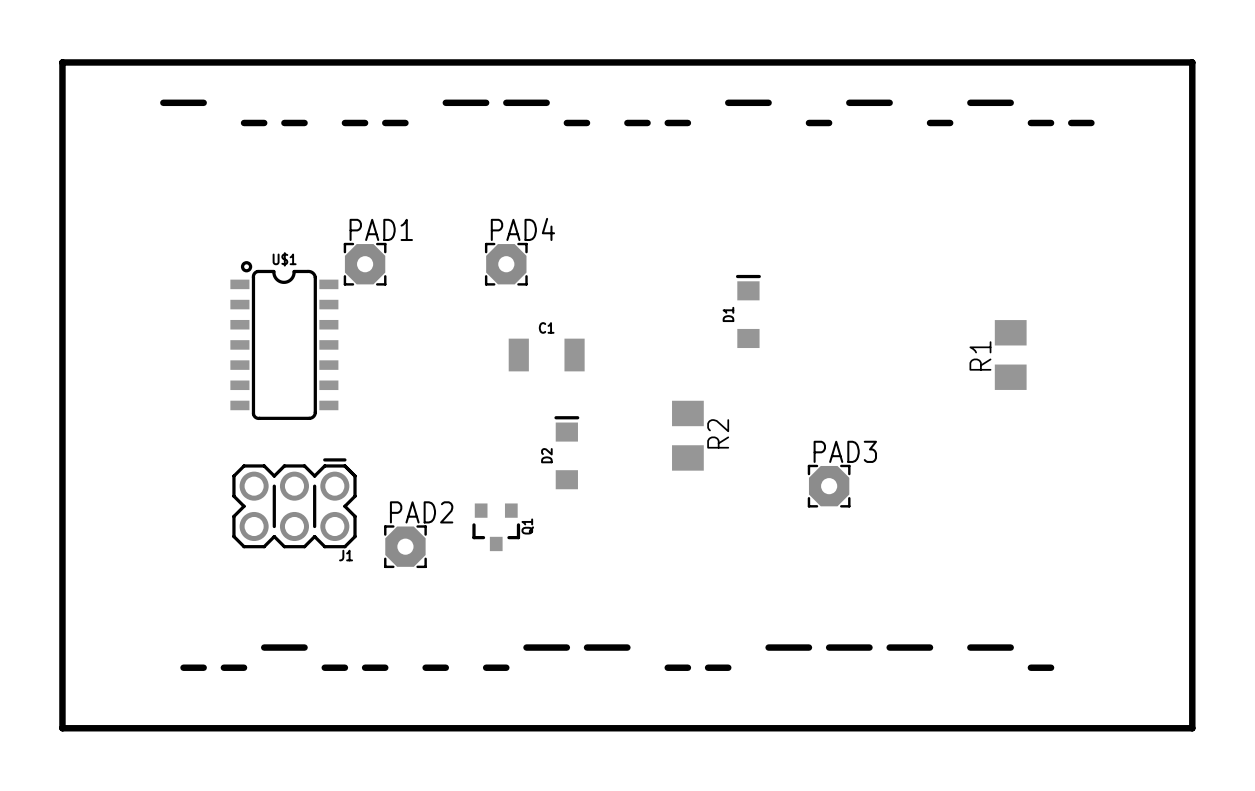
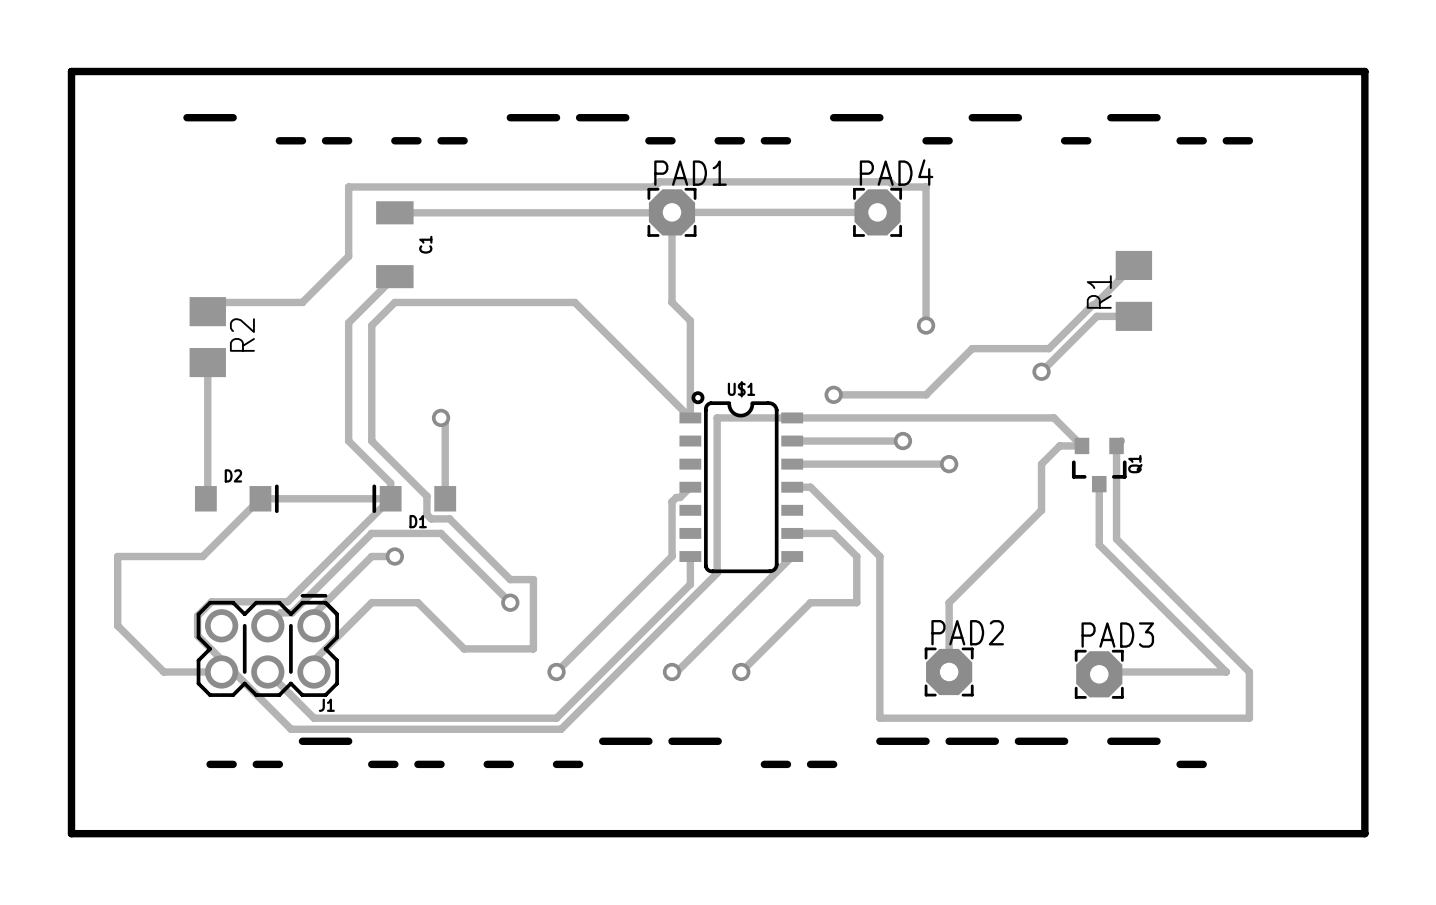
track: none -> (671, 212) (877, 212)
track: none -> (671, 212) (394, 212)
track: none -> (671, 212) (671, 302) (690, 320) (690, 417) (574, 302) (394, 302) (371, 325) (371, 441) (426, 496) (426, 514) (431, 518) (449, 518) (510, 579) (533, 579) (533, 648) (464, 648) (417, 602) (371, 602) (314, 660) (314, 671)
track: none -> (1133, 265) (1048, 348) (972, 348) (926, 394) (833, 394)
track: none -> (394, 276) (348, 322) (348, 441) (390, 483) (390, 498)
PAD1 position: (365, 264) -> (671, 212)
PAD4 position: (506, 264) -> (877, 212)
track: none -> (207, 311) (216, 302) (302, 302) (348, 256) (348, 186) (654, 186) (659, 181) (890, 181) (895, 186) (926, 186) (926, 325)
track: none -> (1133, 316) (1096, 316) (1041, 371)
via: none -> (926, 325)
D1 rotation: 0° (748, 311) -> 90° counterclockwise (414, 498)
D1 position: (748, 311) -> (414, 498)
track: none -> (207, 362) (207, 496) (205, 498)
via: none -> (1041, 371)
U$1 position: (284, 340) -> (741, 482)
via: none -> (833, 394)
C1 rotation: 0° (546, 355) -> 90° clockwise (394, 244)
C1 position: (546, 355) -> (394, 244)
R1 position: (1010, 355) -> (1133, 290)
track: none -> (441, 417) (445, 422) (445, 498)
via: none -> (441, 417)
track: none -> (792, 441) (902, 441)
via: none -> (902, 441)
track: none -> (1121, 441) (1116, 445) (1116, 539) (1249, 671) (1249, 718) (879, 718) (879, 556) (810, 487) (792, 487)
track: none -> (792, 464) (949, 464)
via: none -> (949, 464)
track: none -> (1099, 484) (1099, 544) (1226, 671) (1101, 671) (1099, 674) (1099, 671)
track: none -> (690, 487) (680, 497) (676, 497) (672, 501) (672, 556) (556, 671)
track: none -> (390, 498) (260, 498) (202, 556) (117, 556) (117, 625) (163, 671) (221, 671)
track: none -> (390, 498) (287, 601) (211, 601) (197, 615) (197, 635) (291, 729) (561, 729) (717, 573) (717, 417) (1053, 417) (1081, 445) (1059, 445) (1041, 464) (1041, 510) (949, 602) (949, 671)
R2 position: (687, 435) -> (207, 337)
D2 rotation: 0° (566, 452) -> 90° clockwise (236, 498)
D2 position: (566, 452) -> (236, 498)
track: none -> (792, 533) (833, 533) (856, 556) (856, 602) (810, 602) (741, 671)
track: none -> (394, 556) (371, 556) (314, 614) (314, 625)
via: none -> (394, 556)
track: none -> (690, 556) (690, 584) (556, 718) (314, 718) (267, 671)
track: none -> (792, 556) (676, 671) (671, 671)
PAD3 position: (829, 486) -> (1099, 674)
J1 position: (294, 503) -> (267, 645)
track: none -> (510, 602) (441, 533) (371, 533) (292, 612) (280, 612) (267, 625)
via: none -> (510, 602)
Q1 position: (496, 527) -> (1099, 465)
PAD2 position: (405, 546) -> (949, 671)
via: none -> (556, 671)
via: none -> (671, 671)
via: none -> (741, 671)

